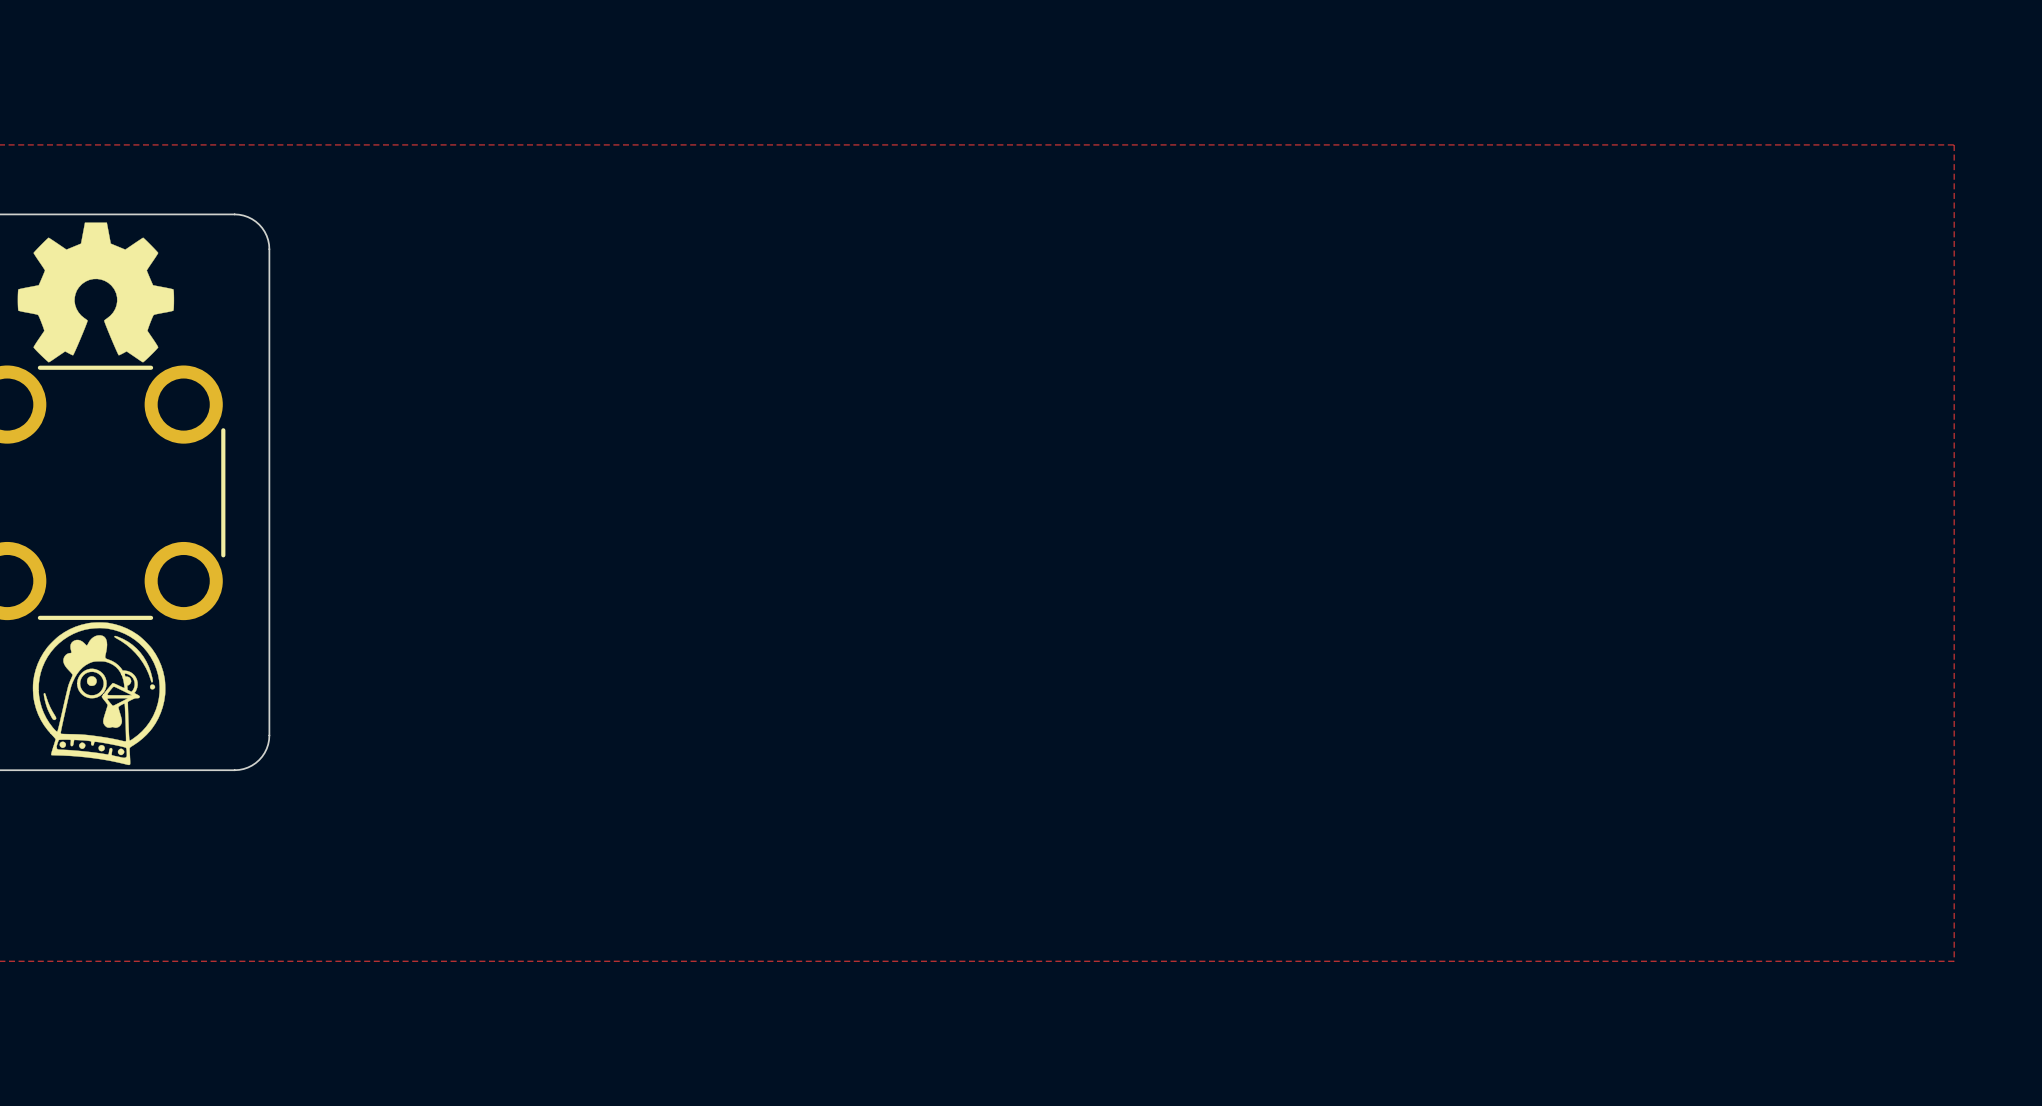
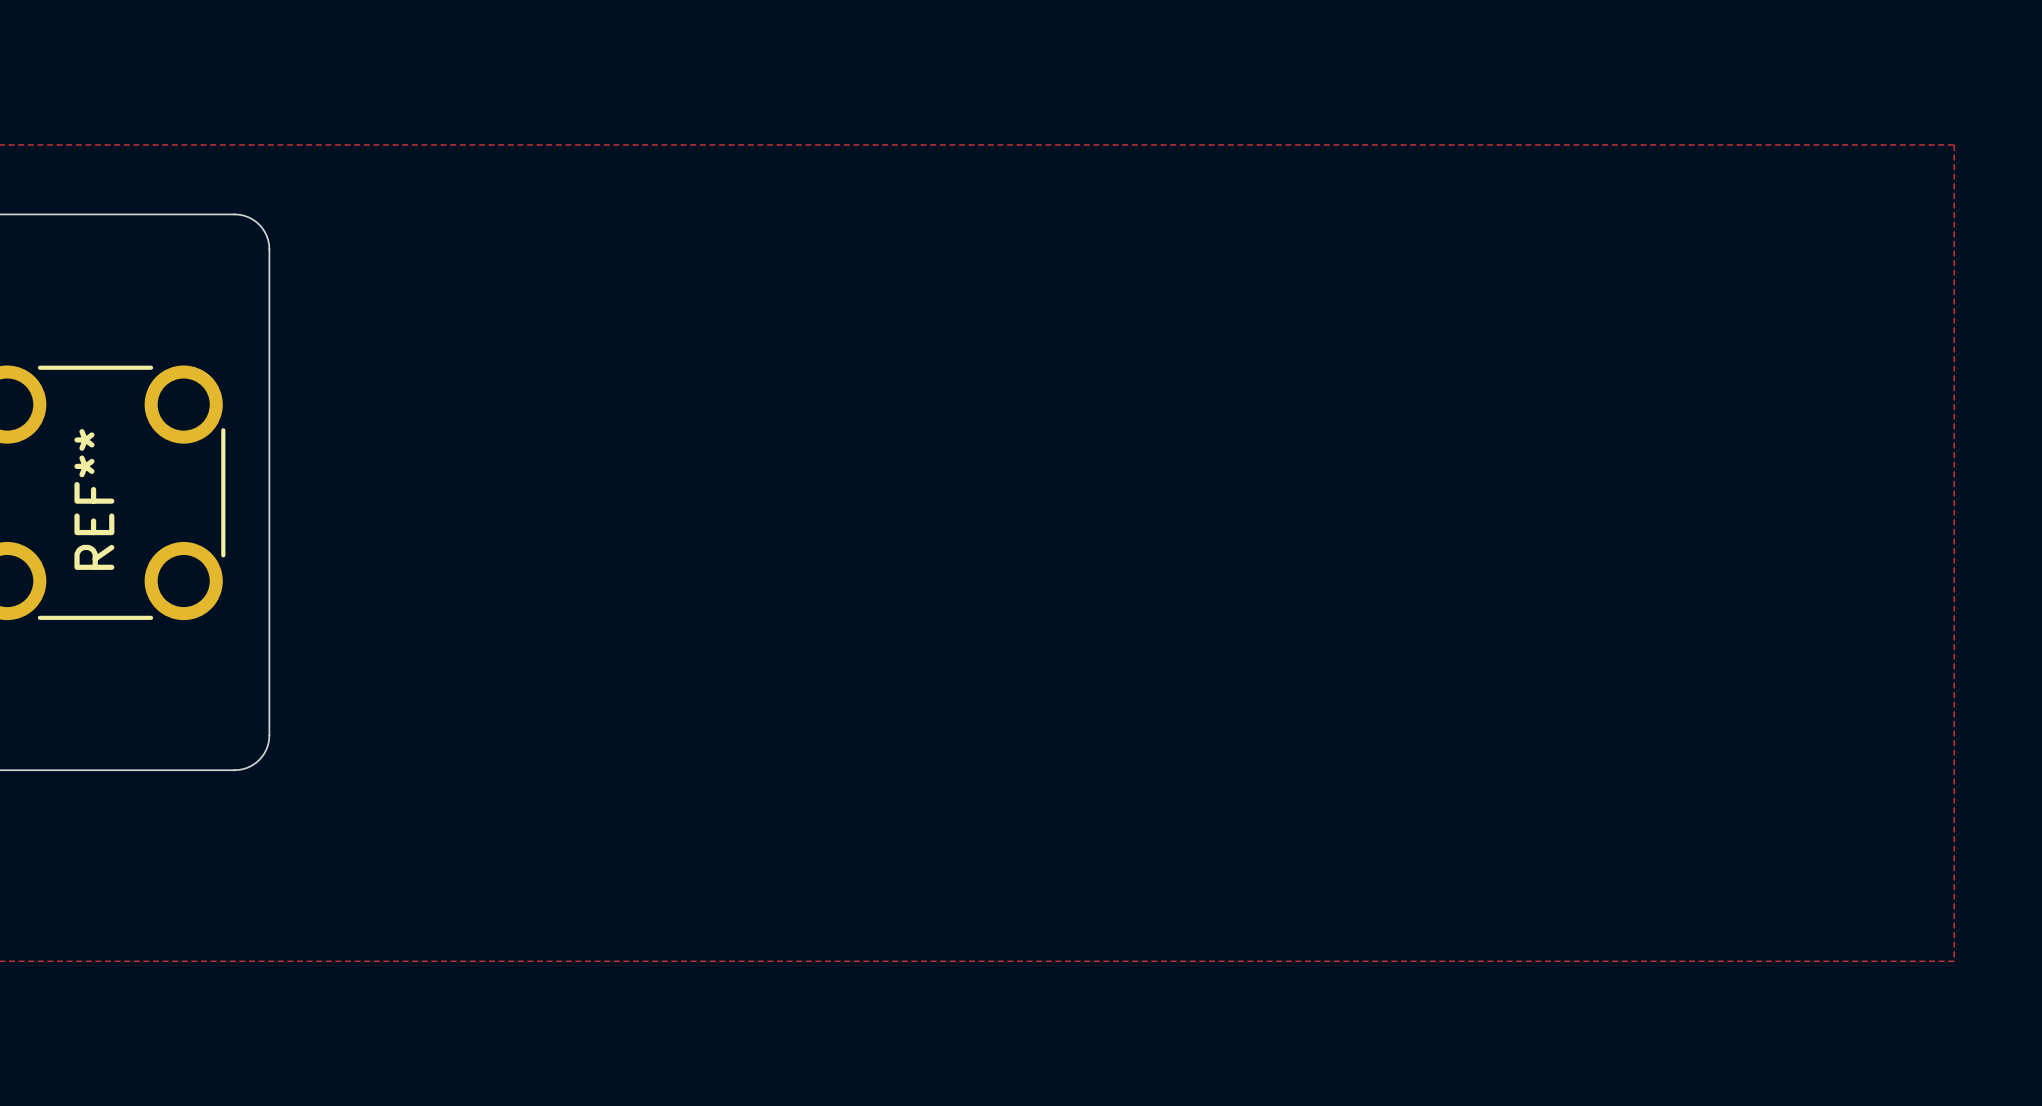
drawing: [17, 222, 175, 363] -> none
REF** name: none -> REF** (94, 499)
drawing: [32, 622, 166, 766] -> none

